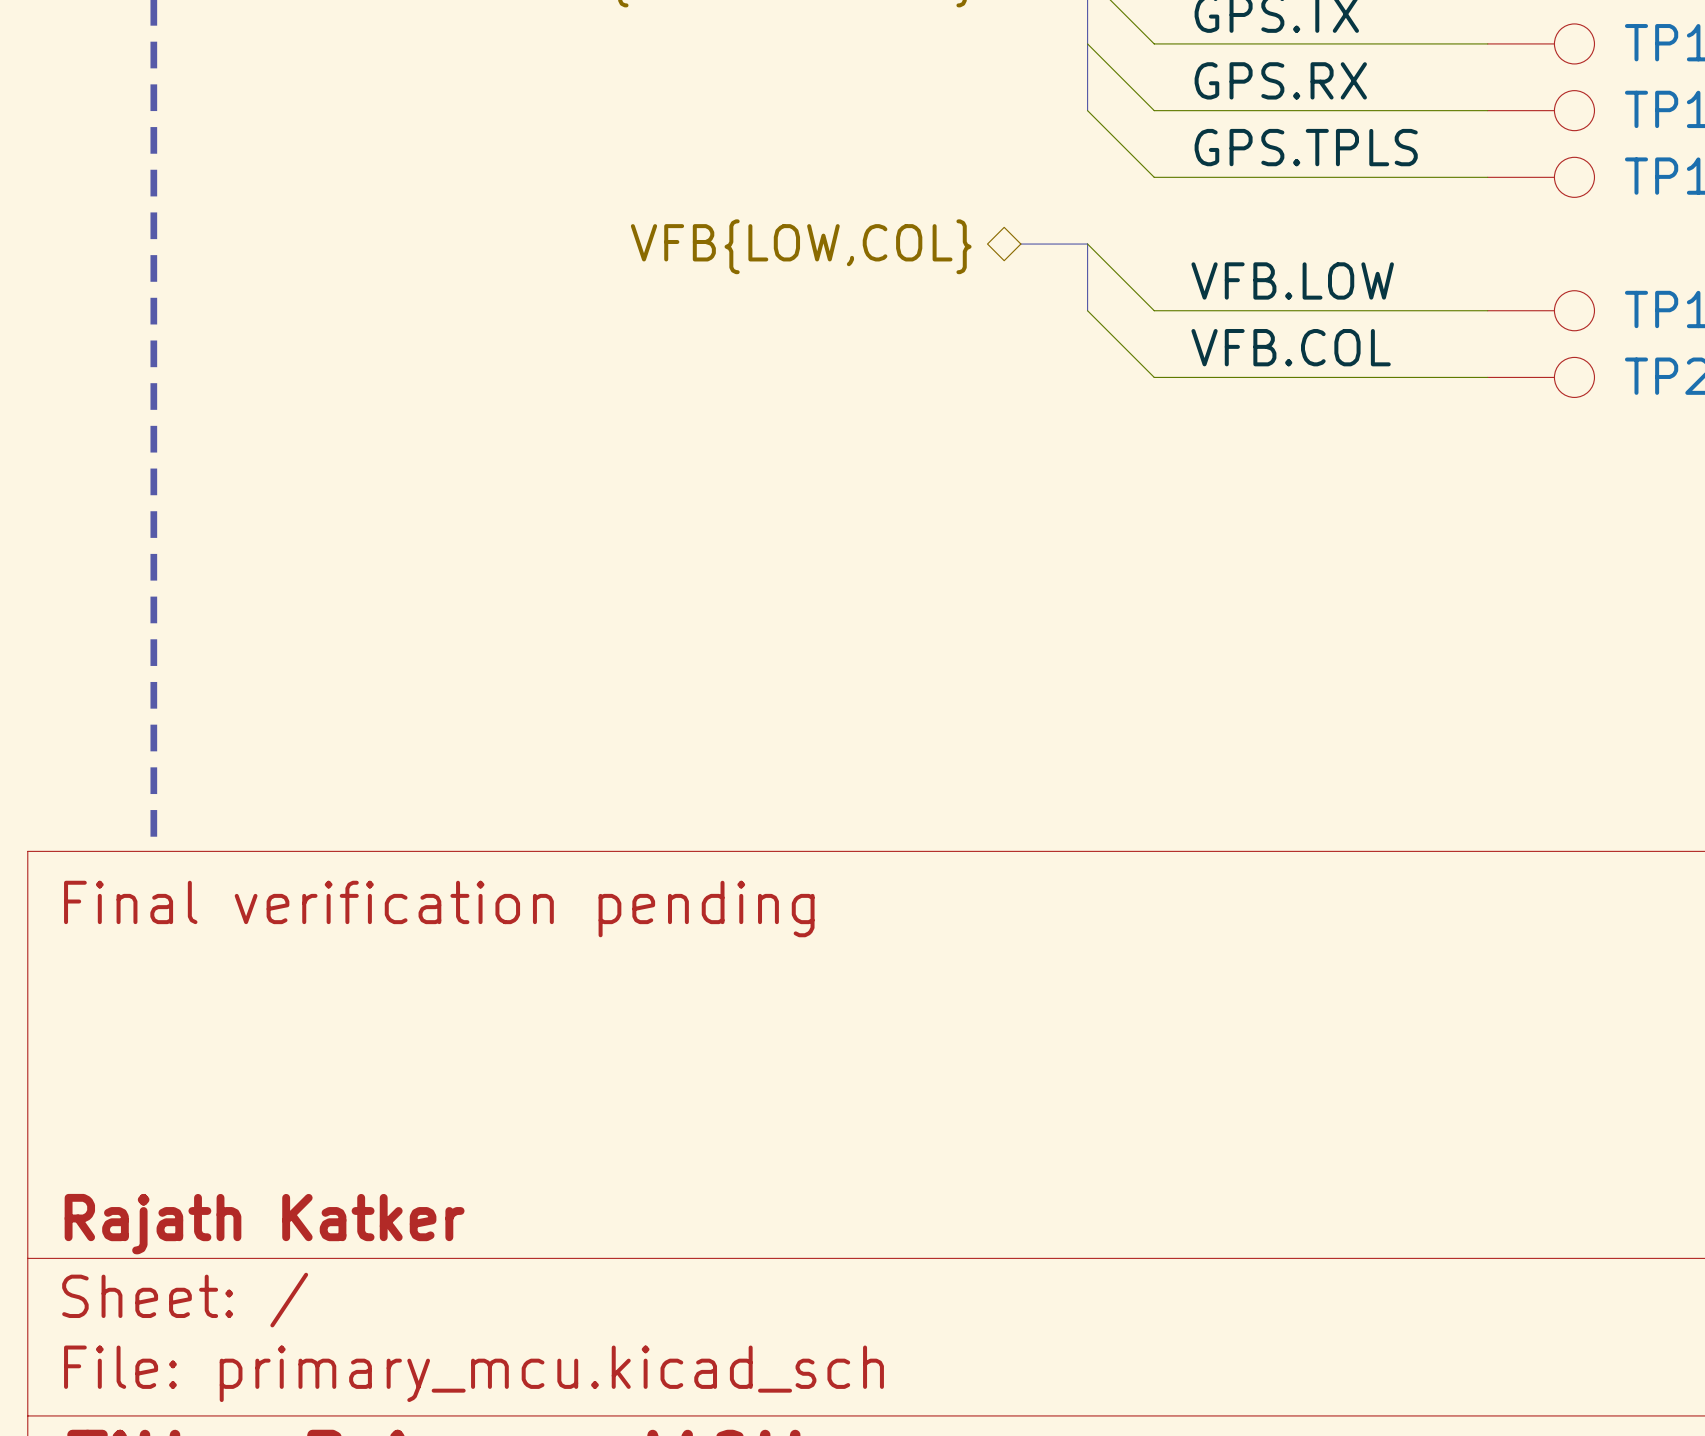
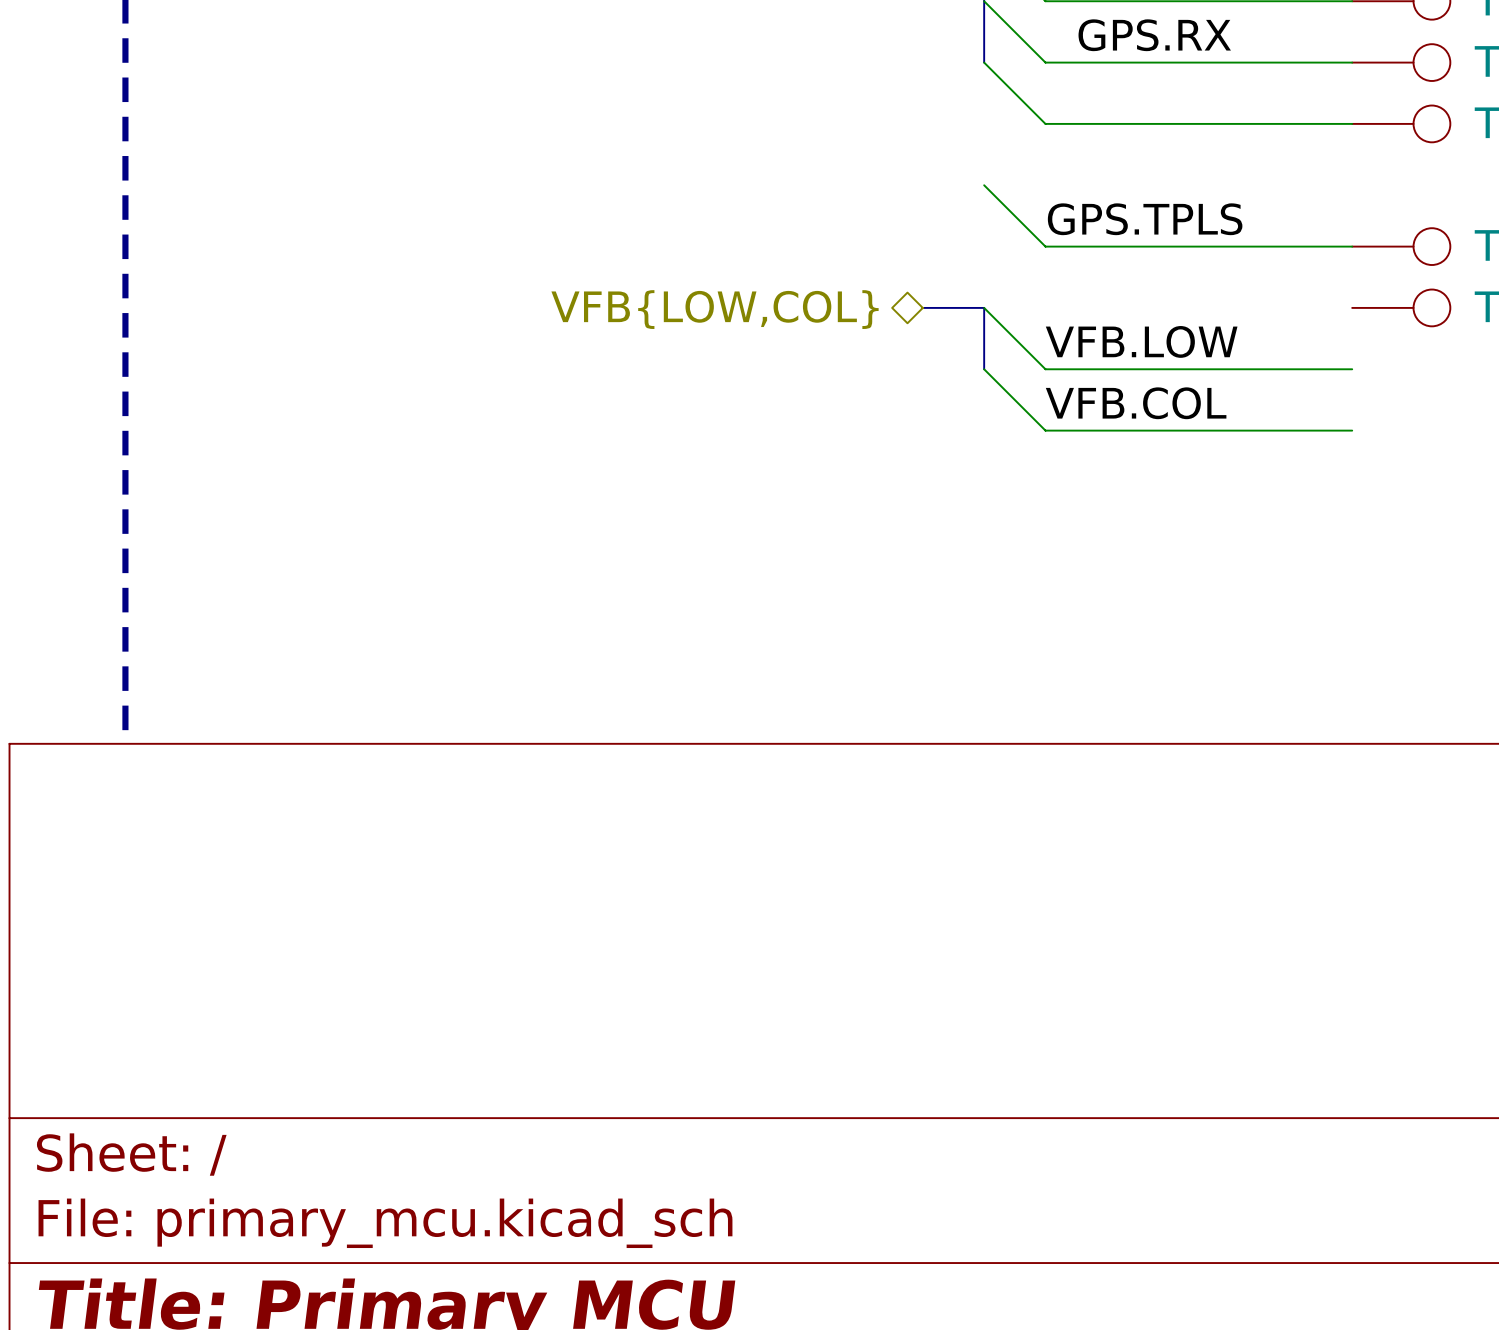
label position: GPS.TPLS (1306, 147) -> GPS.TPLS (1145, 219)
bus: (1020, 244) (1087, 244) (1087, 310) -> (922, 307) (984, 307) (984, 369)
hierarchical label position: VFB{LOW,COL} (801, 246) -> VFB{LOW,COL} (715, 309)
label position: VFB.LOW (1292, 280) -> VFB.LOW (1141, 341)
wire: (1087, 310) (1154, 377) (1487, 377) -> (984, 307) (1045, 369) (1352, 369)
label position: VFB.COL (1291, 347) -> VFB.COL (1136, 403)
wire: none -> (984, 369) (1045, 430) (1352, 430)
title block: Final verification pending (439, 909) -> none
title block: Rajath Katker (264, 1224) -> none

